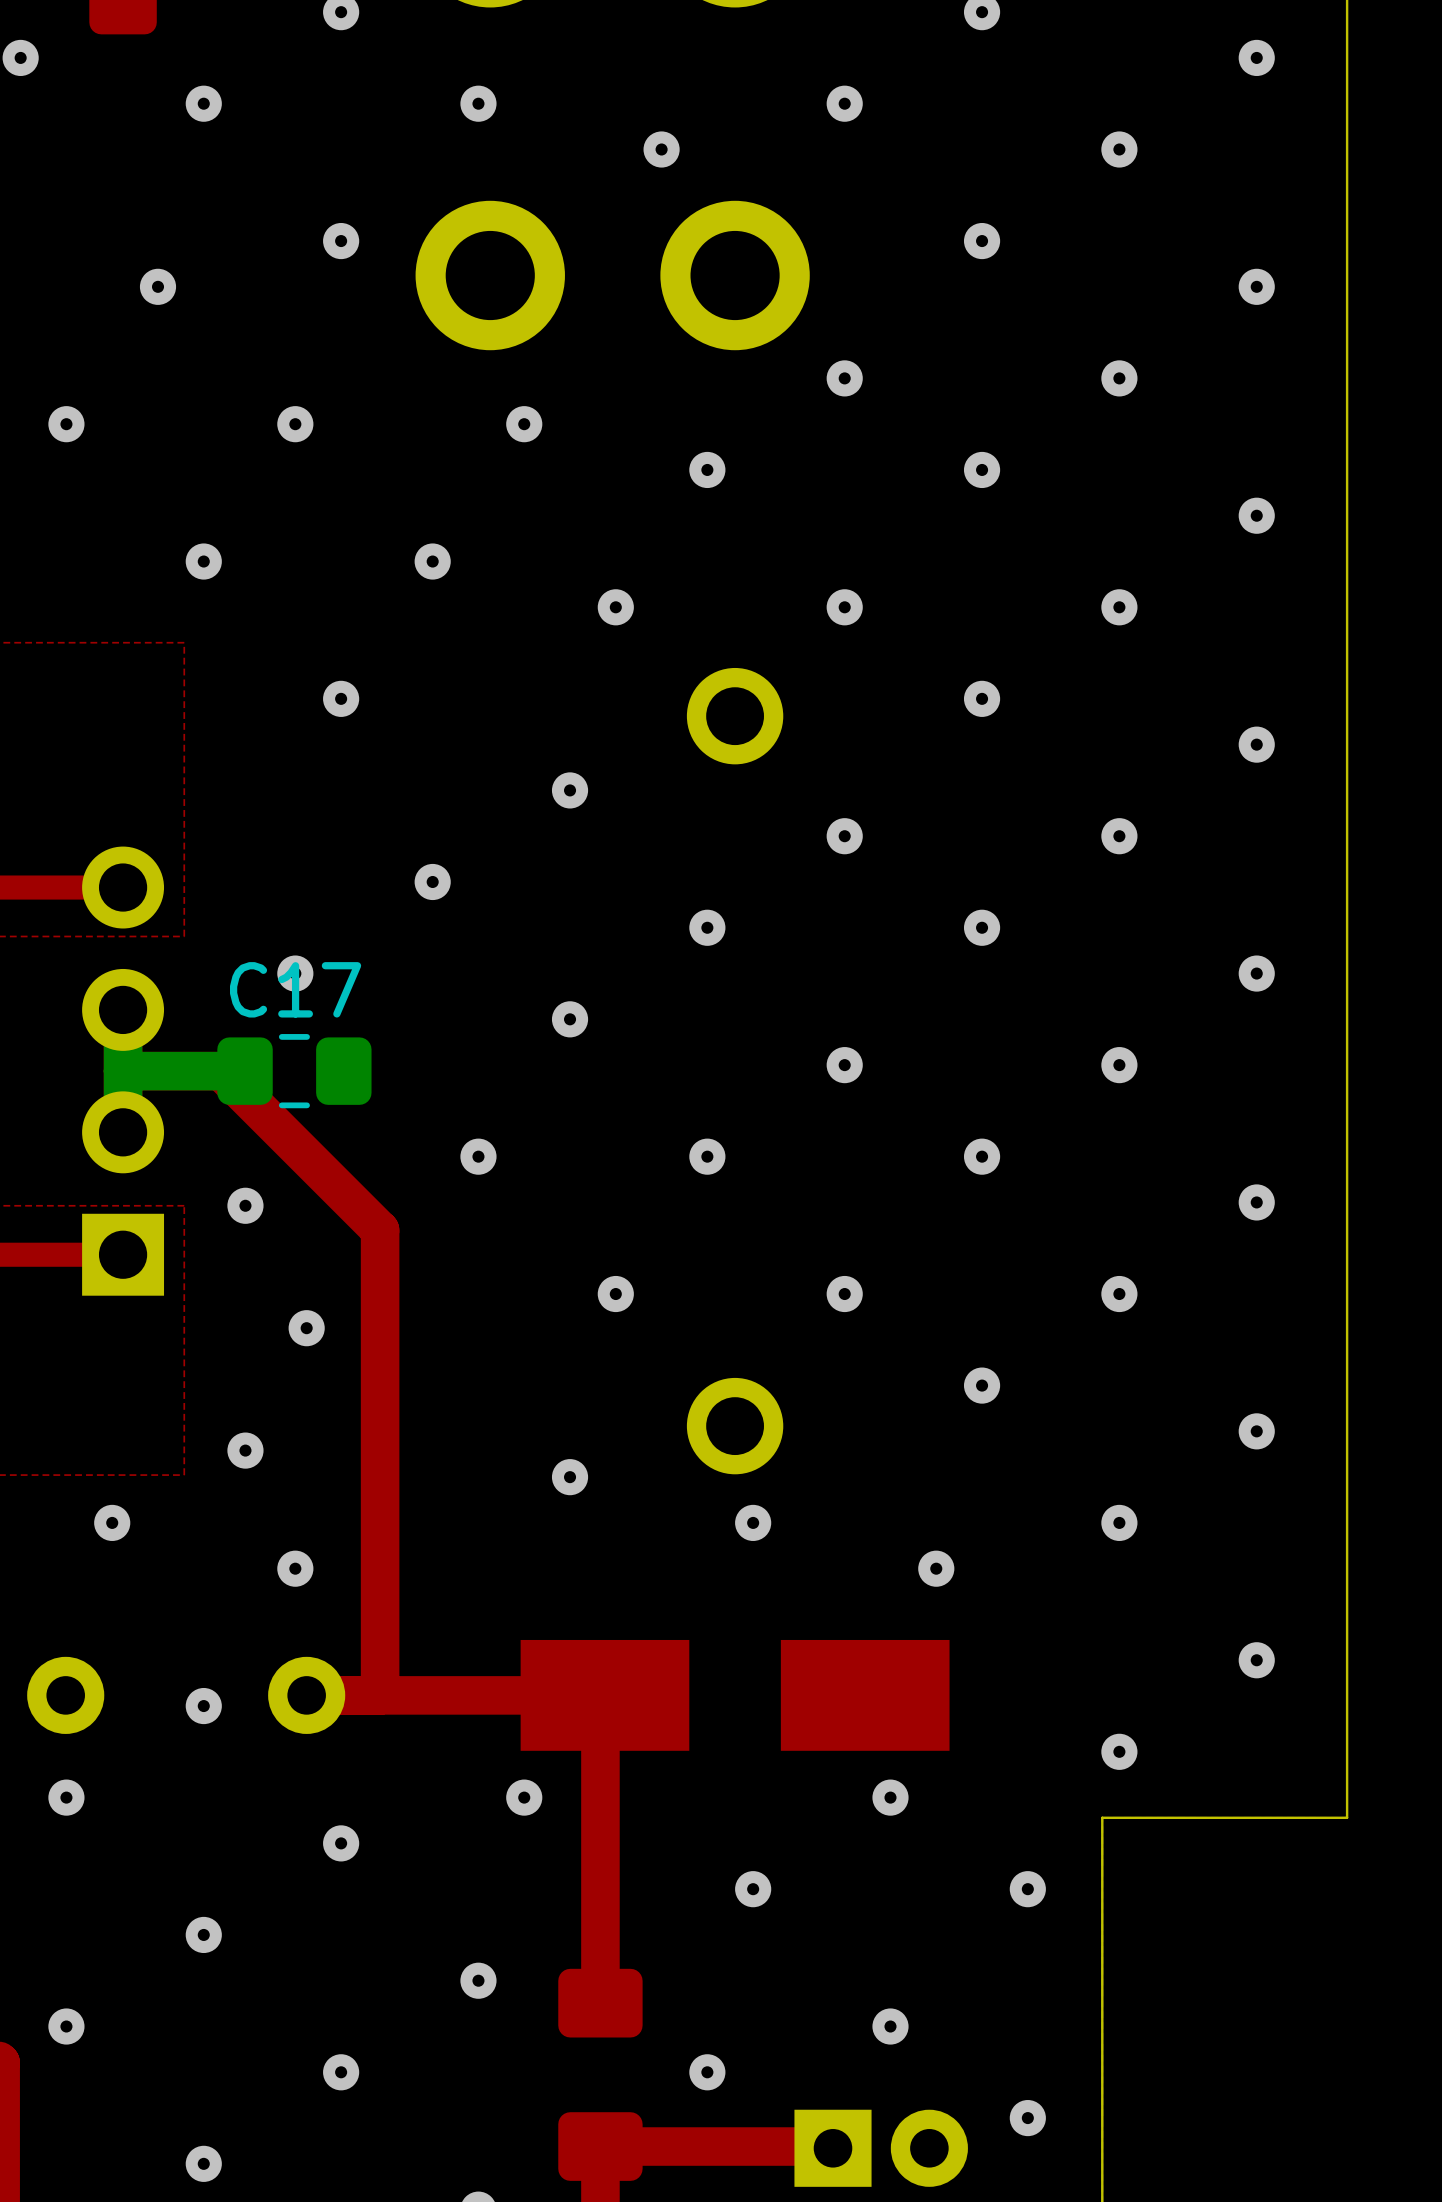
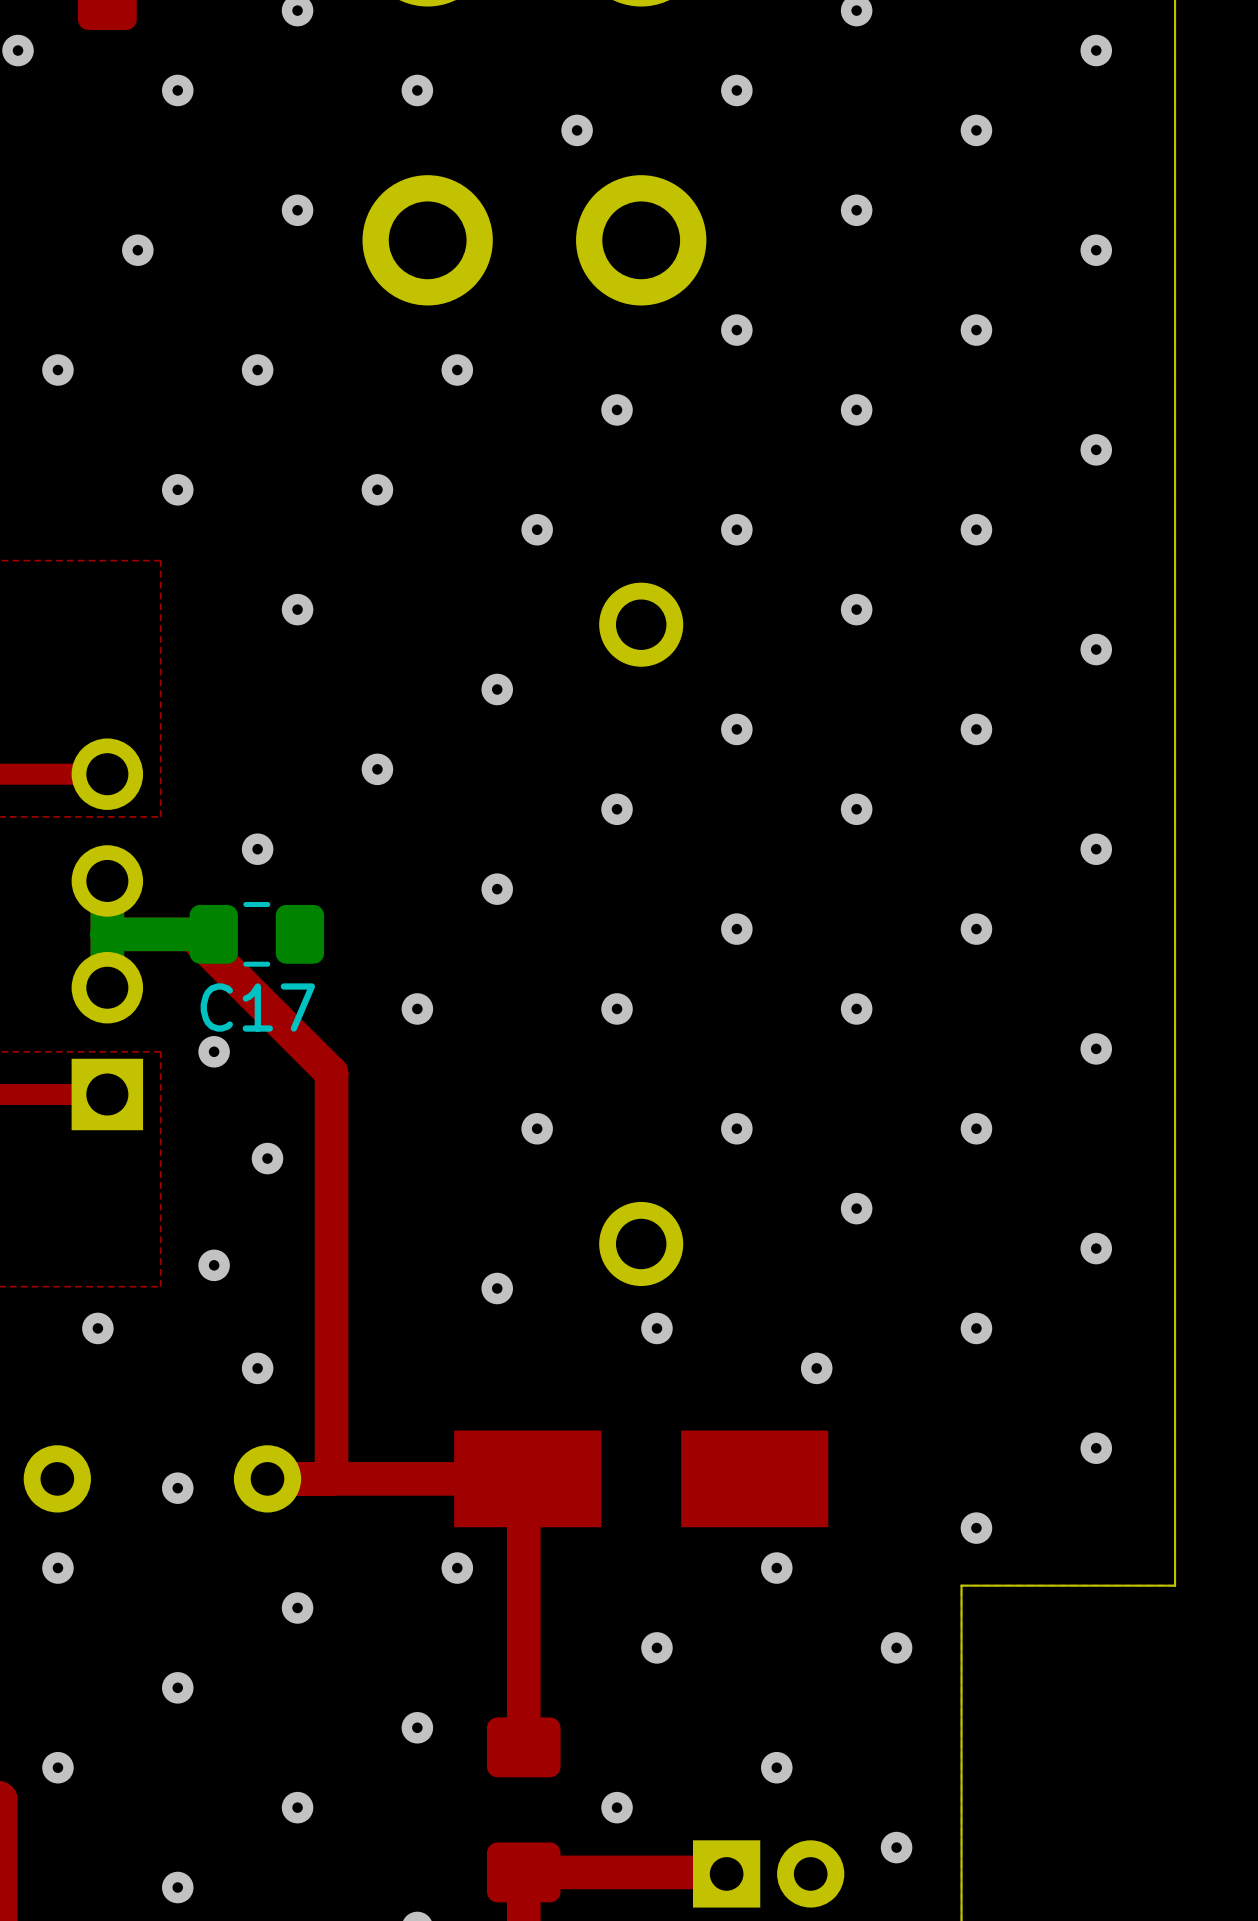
C17 name position: C17 (295, 989) -> C17 (257, 1007)

